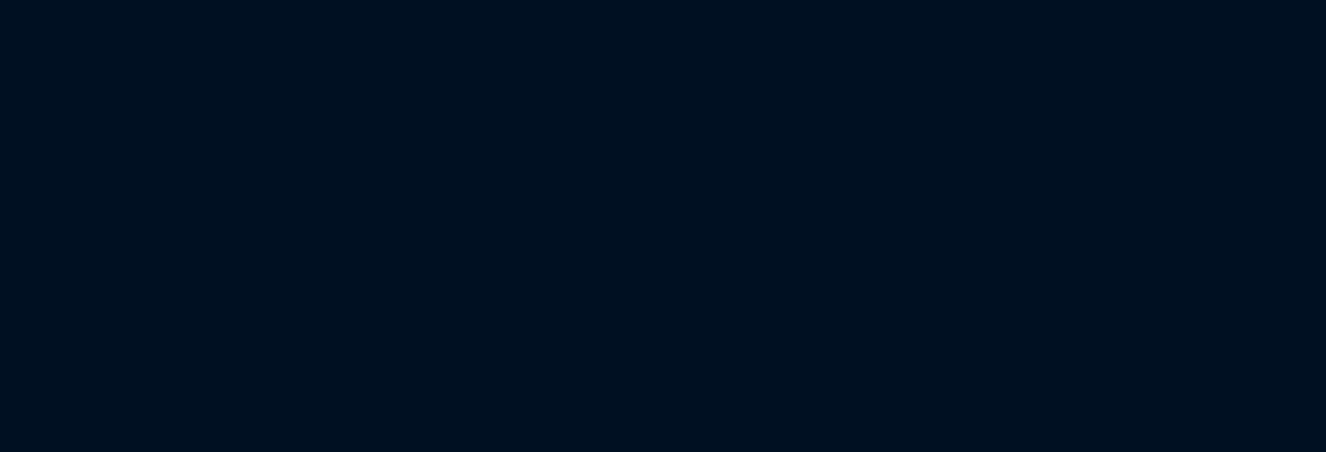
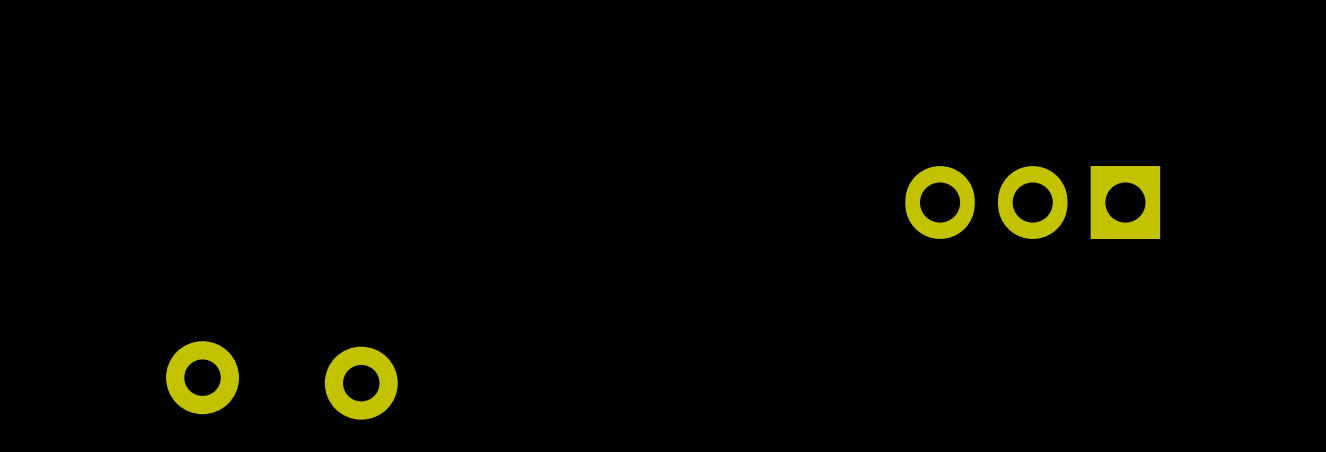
part: none -> (1032, 202)
part: none -> (202, 377)
part: none -> (361, 383)

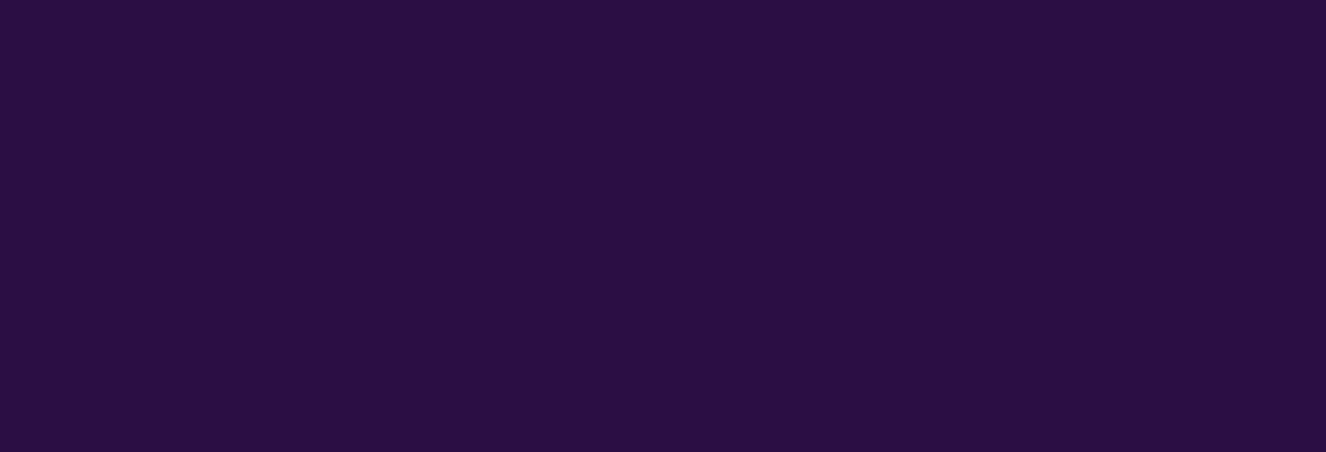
part: (1032, 202) -> none
part: (202, 377) -> none
part: (361, 383) -> none

